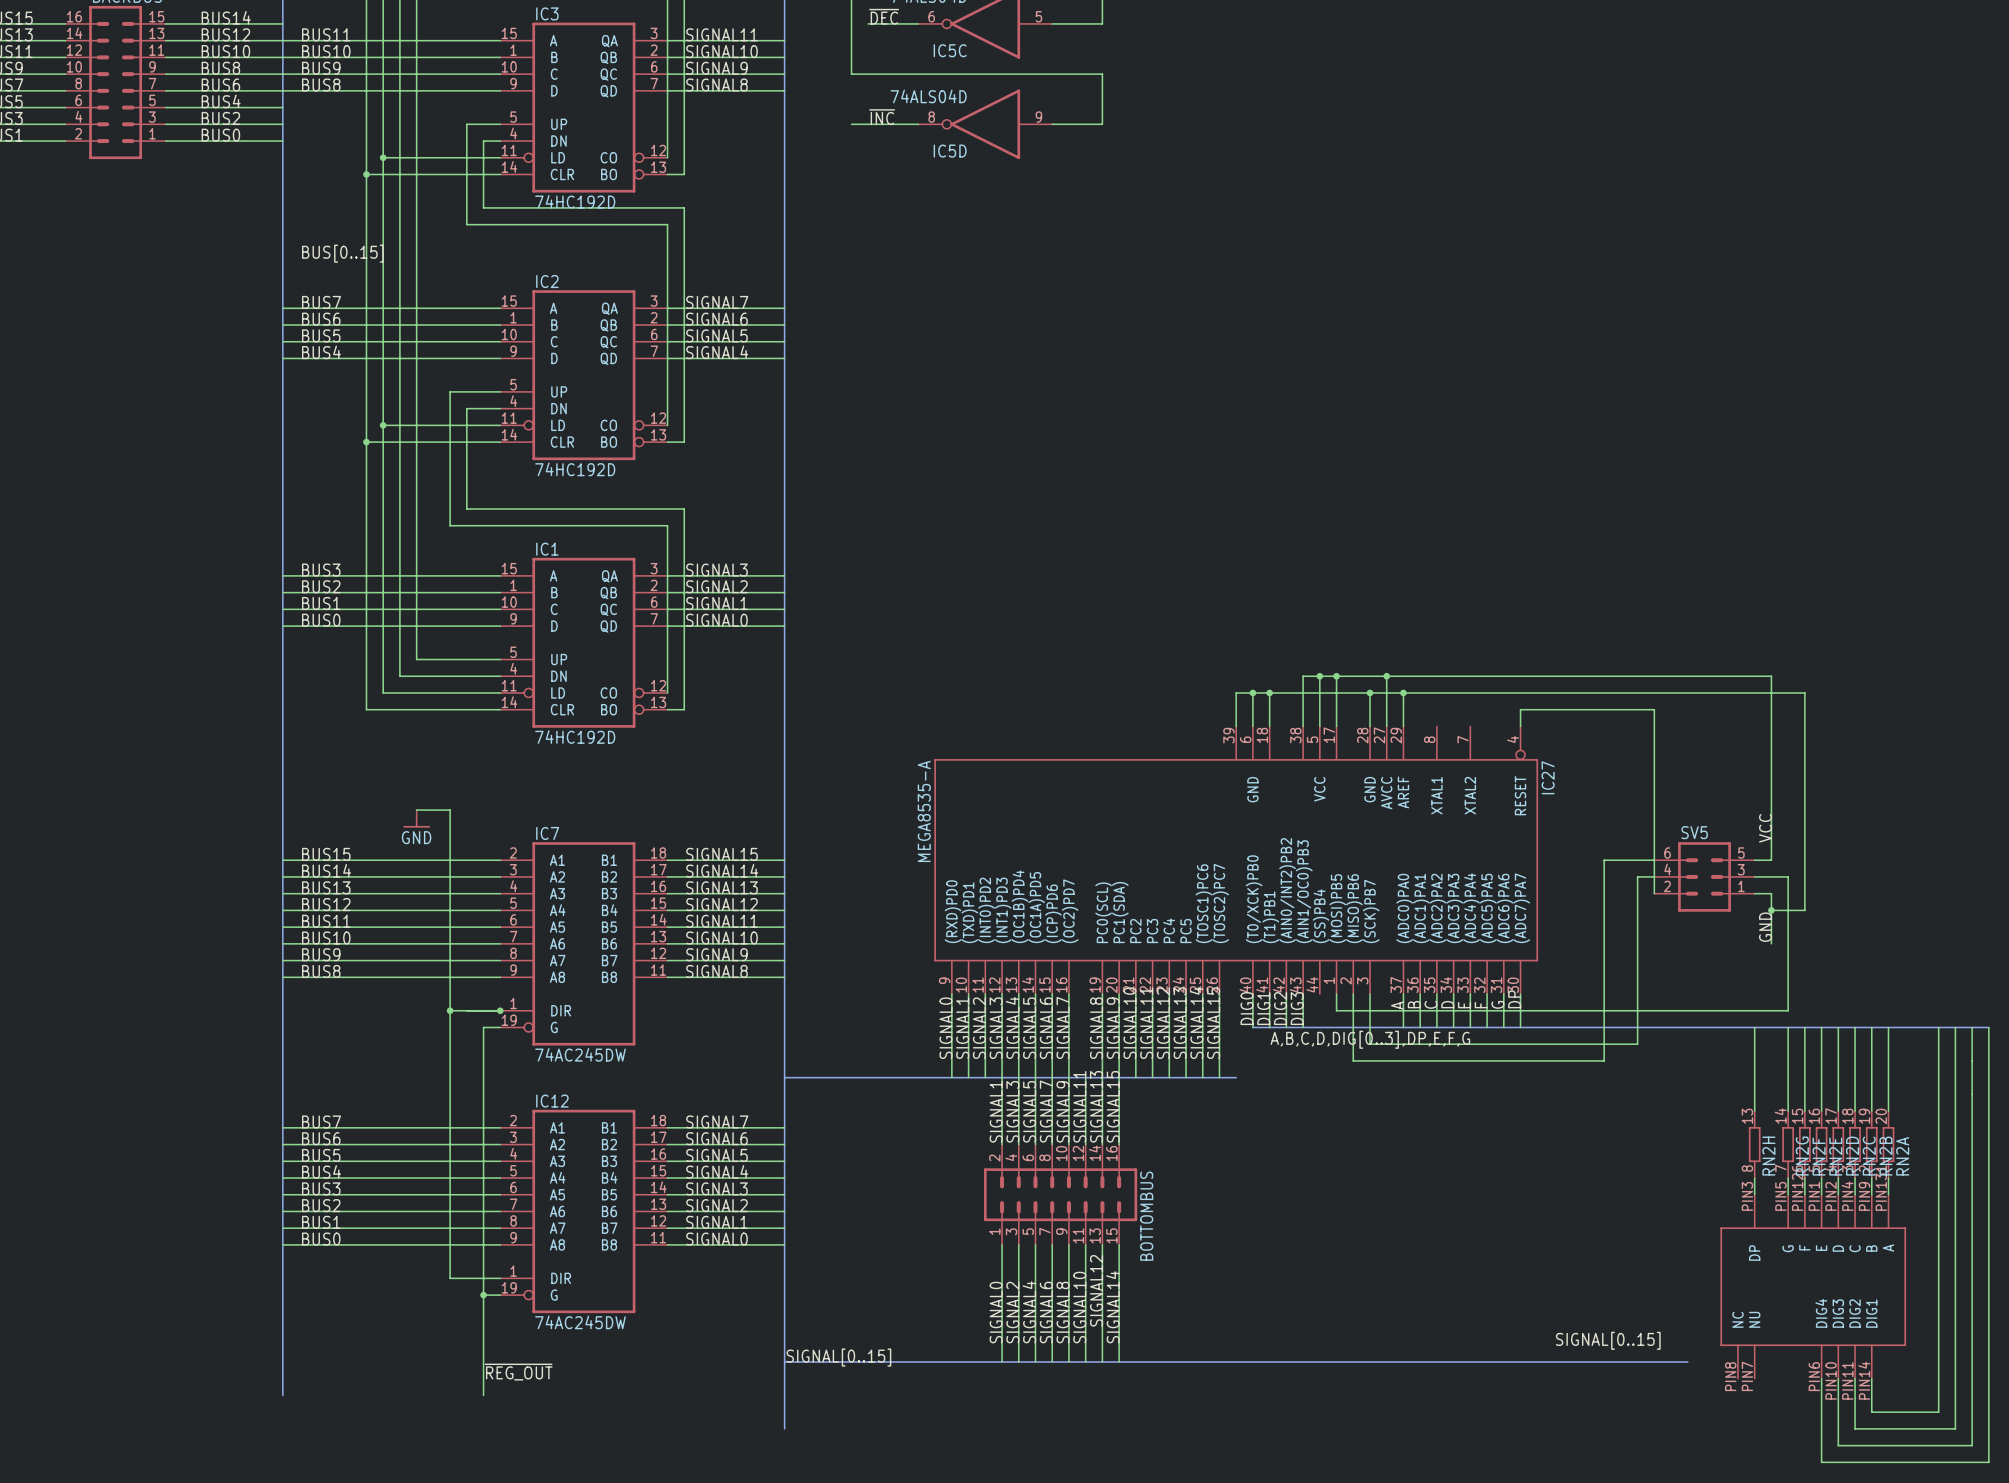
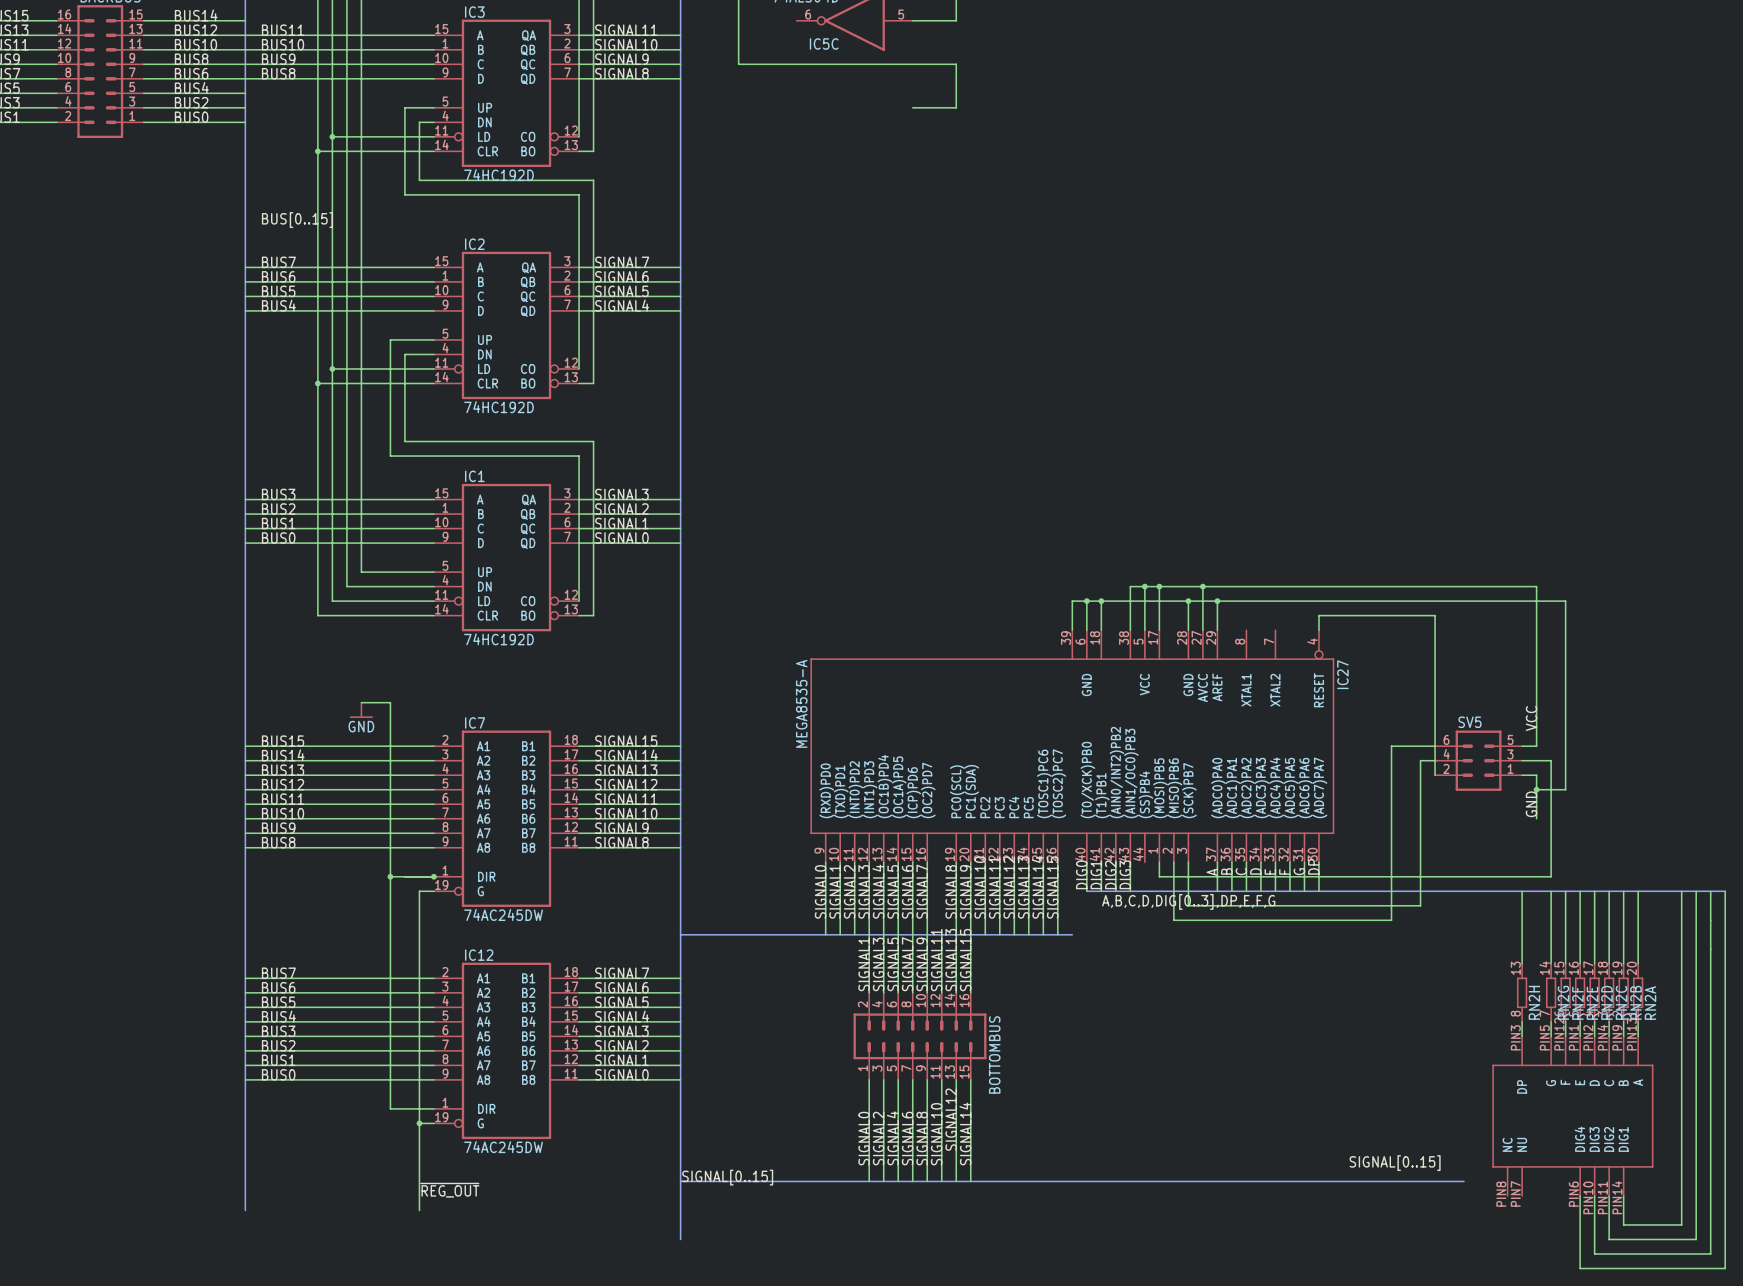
label: ~{DEC} (884, 16) -> none
wire: (868, 23) (918, 23) -> none
label: ~{INC} (882, 117) -> none
wire: (851, 124) (918, 124) -> none
IC5D: 74ALS04D (985, 124) -> none

